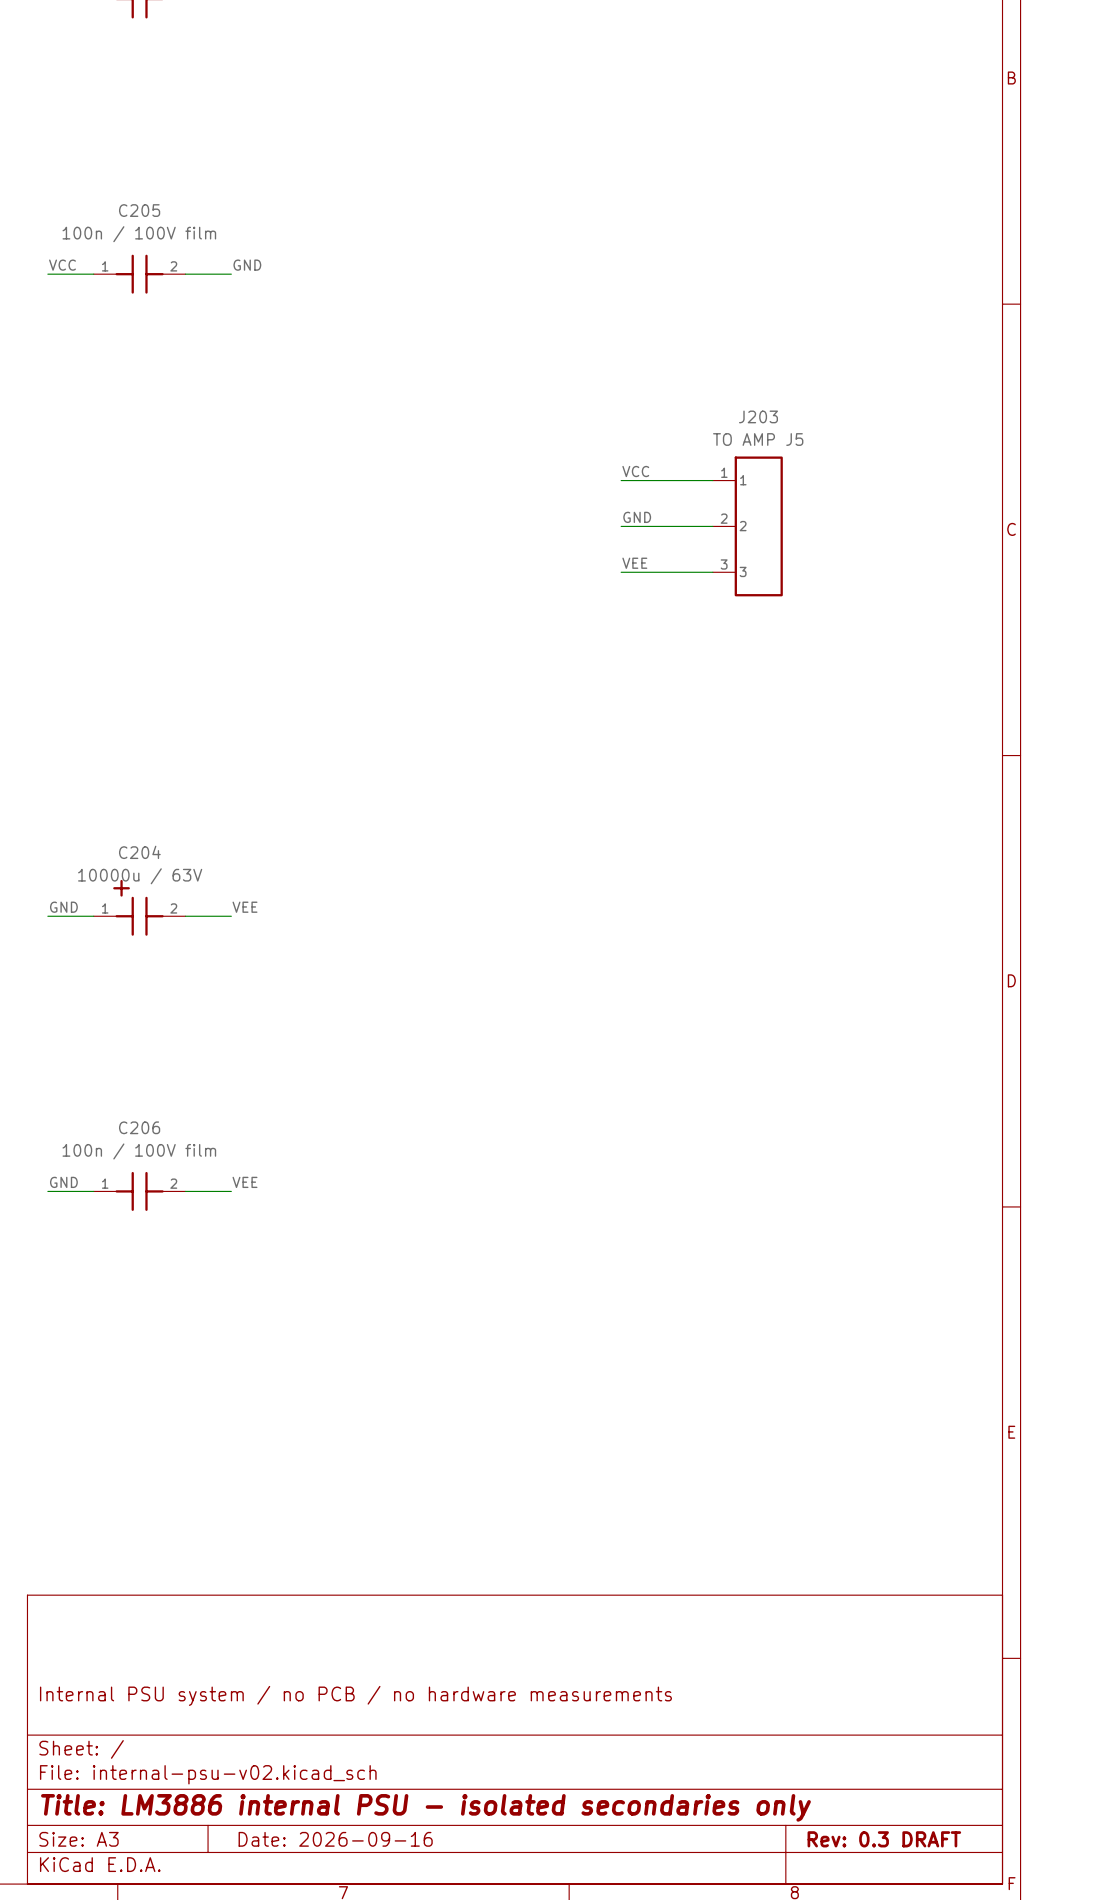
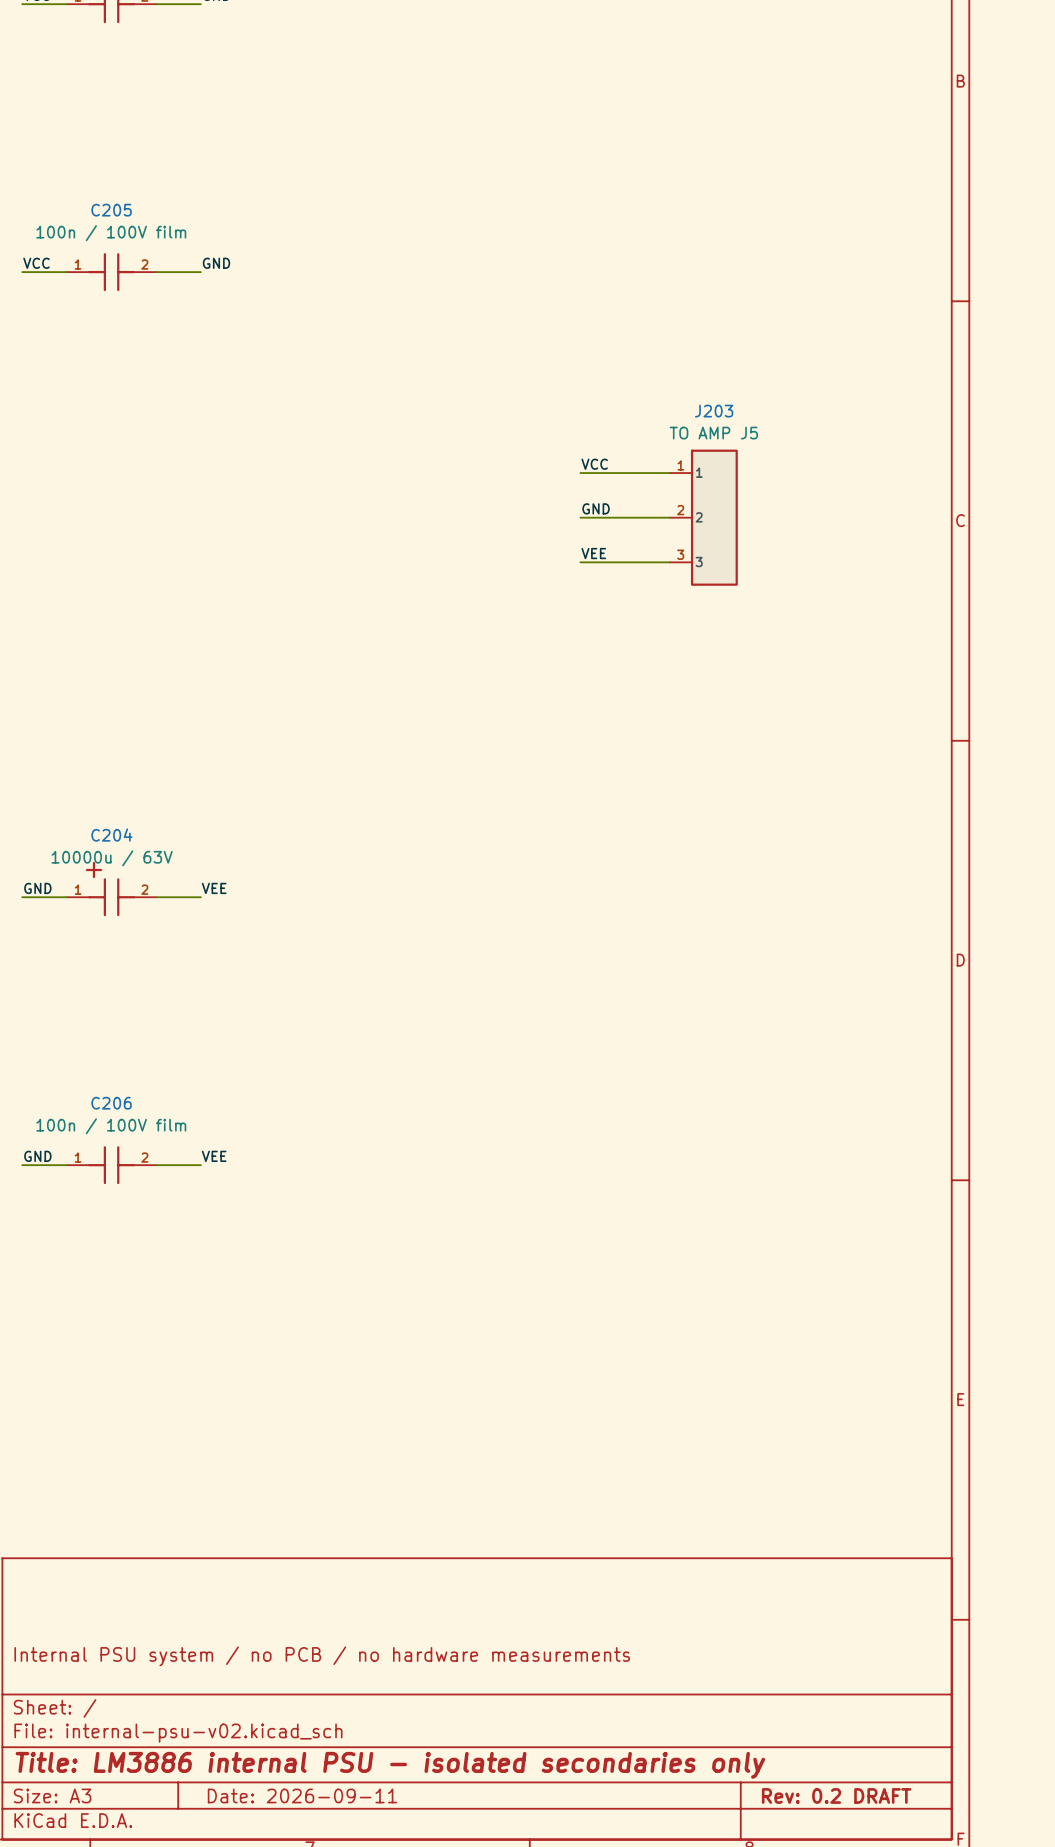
title block: Date: 2026-09-16 (335, 1839) -> Date: 2026-09-11 (302, 1795)
title block: Rev: 0.3 DRAFT (884, 1839) -> Rev: 0.2 DRAFT (836, 1795)

